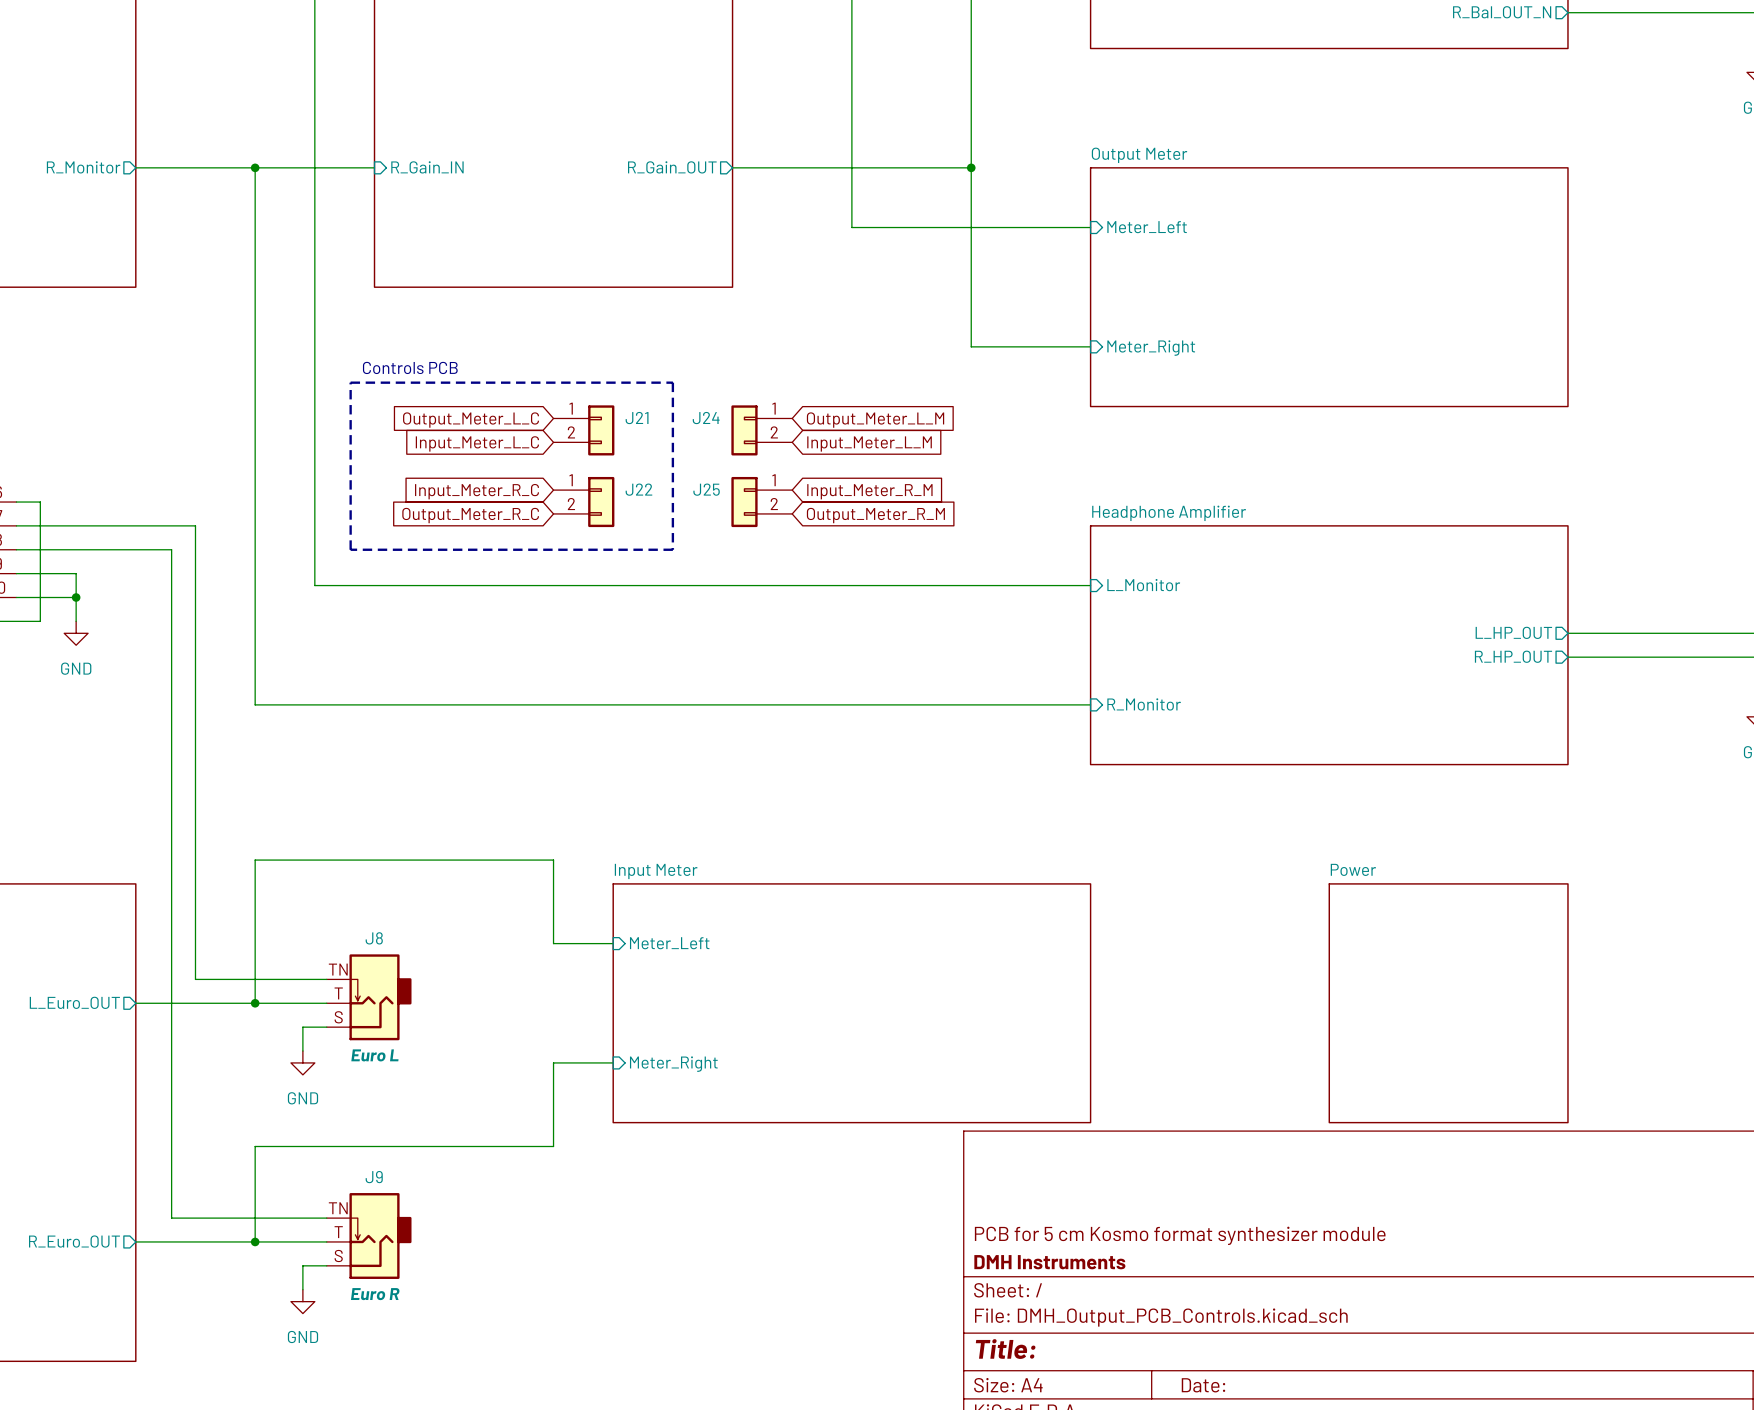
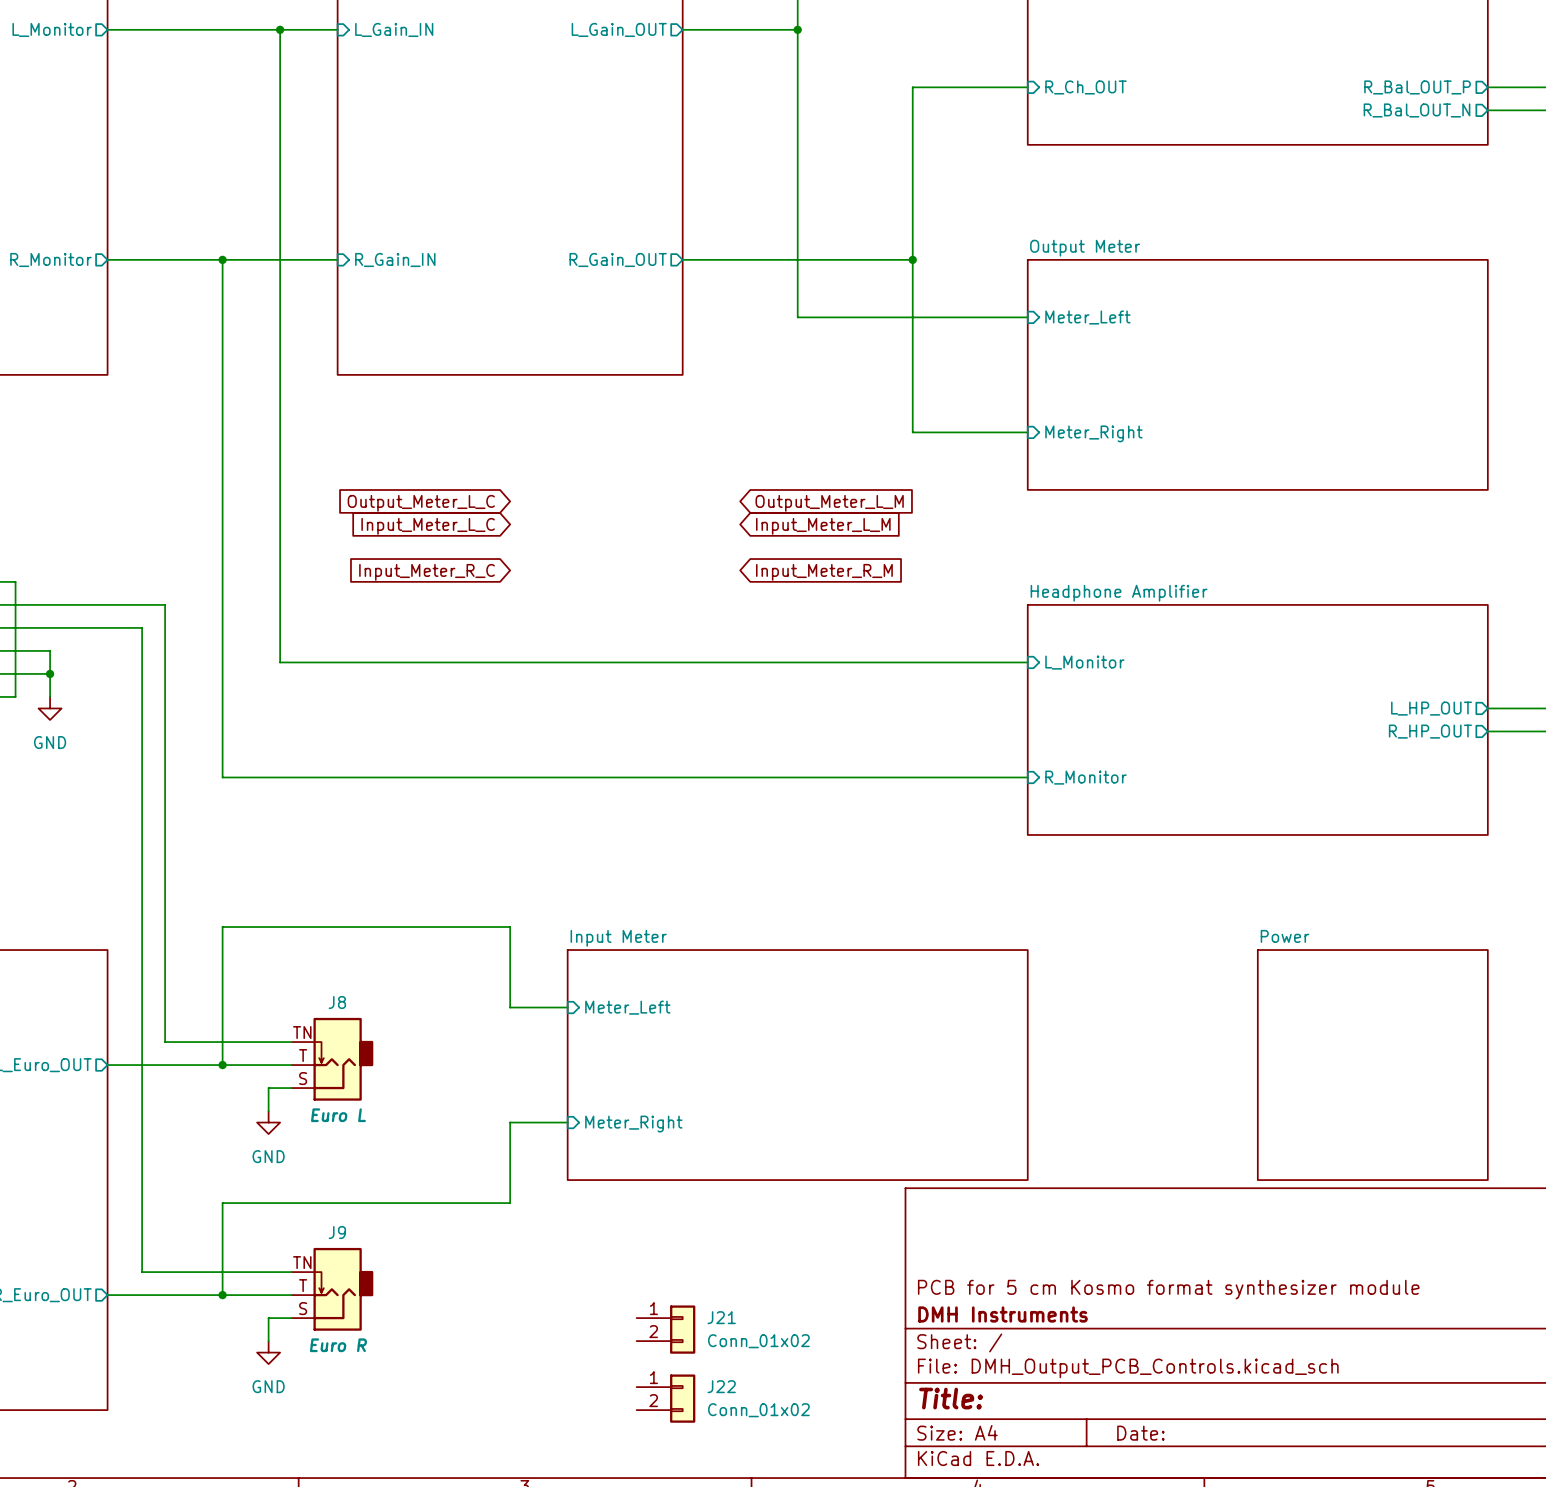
text: Controls PCB (410, 367) -> none
line: (350, 382) (672, 382) (672, 549) (350, 549) (350, 382) -> none
J21 position: (583, 430) -> (666, 1329)
J24: (761, 430) -> none
J22 position: (583, 502) -> (666, 1398)
J25: (761, 502) -> none
global label: Output_Meter_R_C (470, 515) -> none
global label: Output_Meter_R_M (875, 515) -> none
J21 value: none -> Conn_01x02 (758, 1341)
J22 value: none -> Conn_01x02 (758, 1410)

